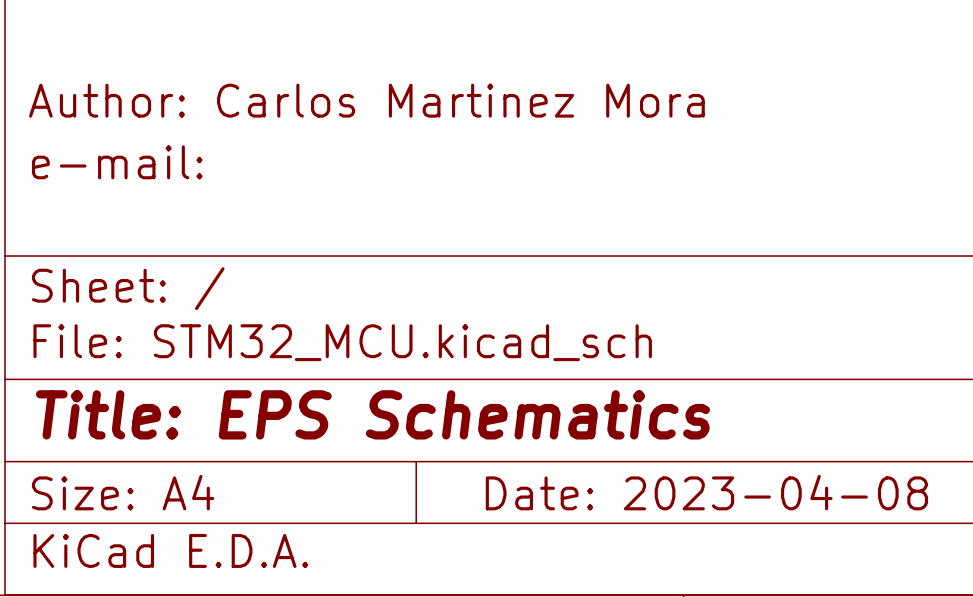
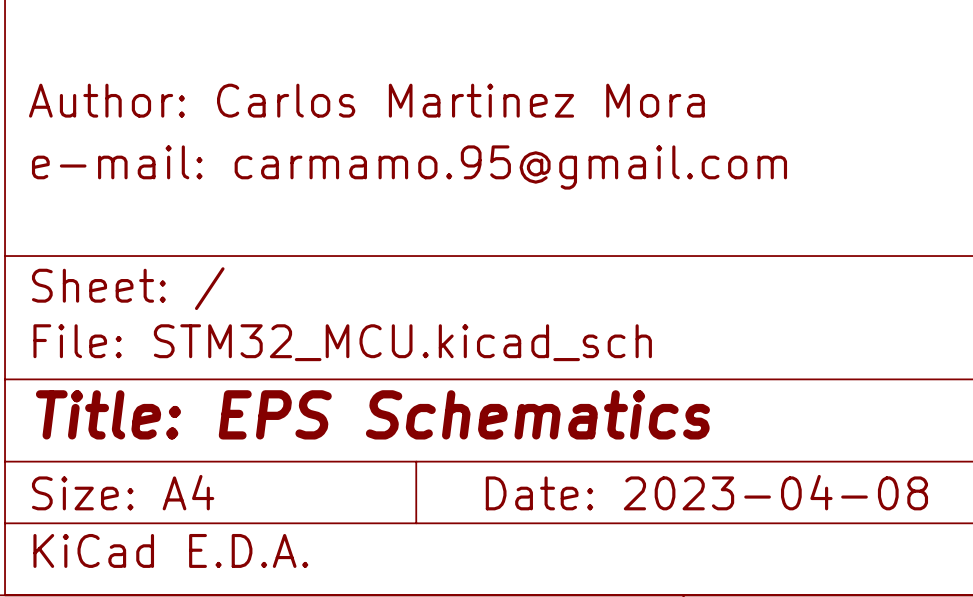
title block: e-mail: (117, 162) -> e-mail: carmamo.95@gmail.com (409, 167)

